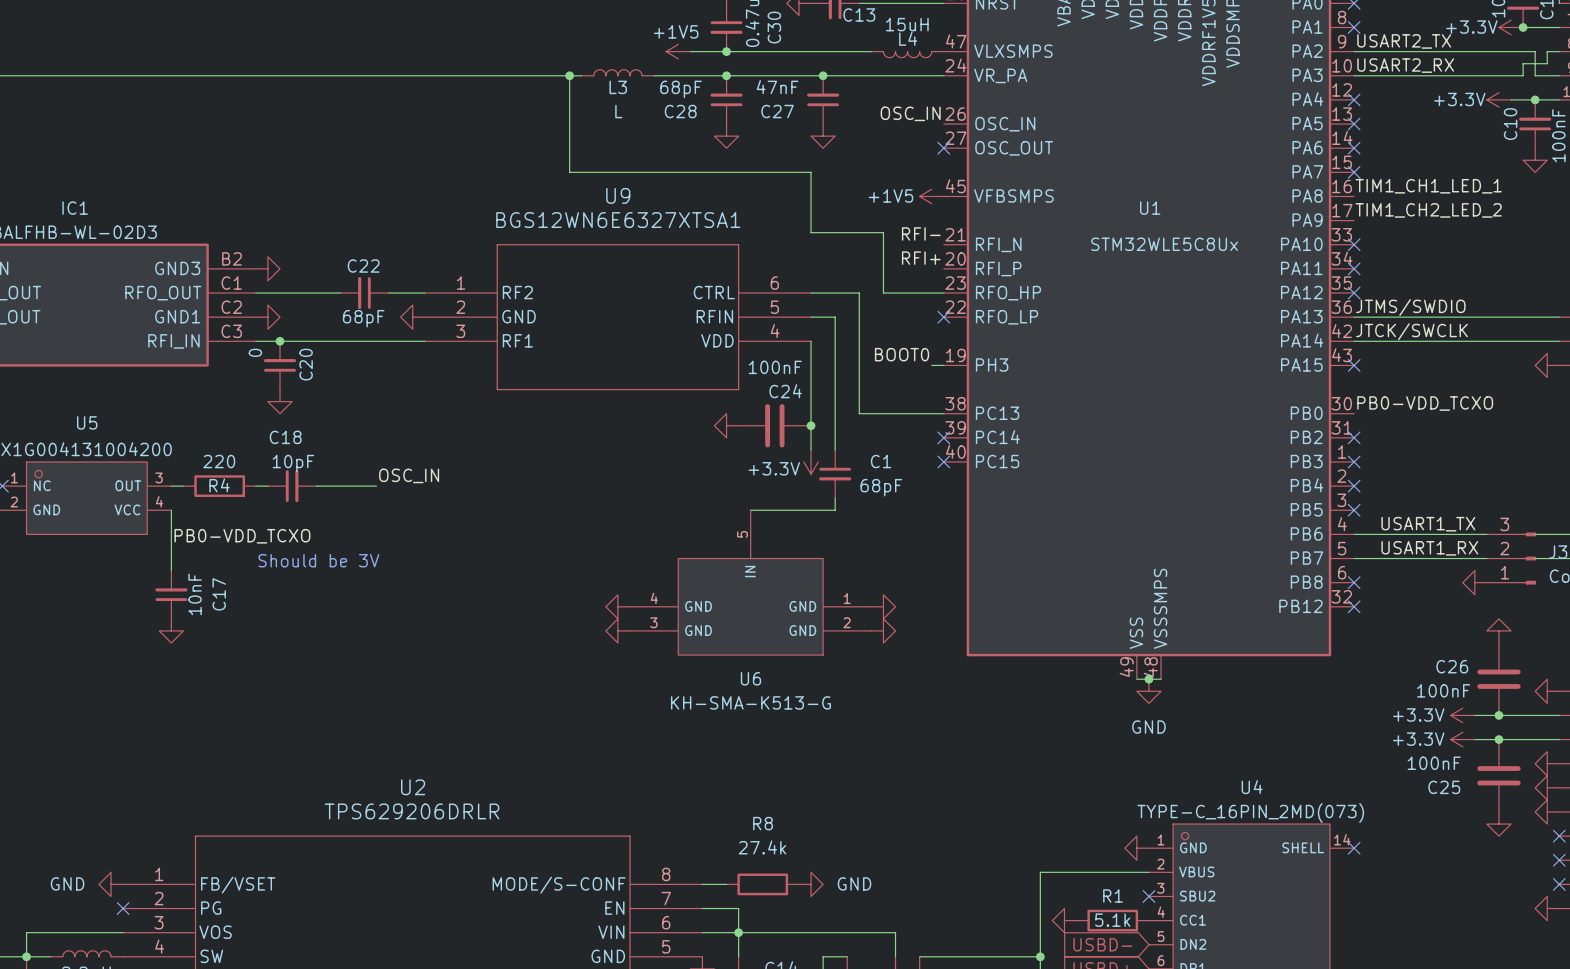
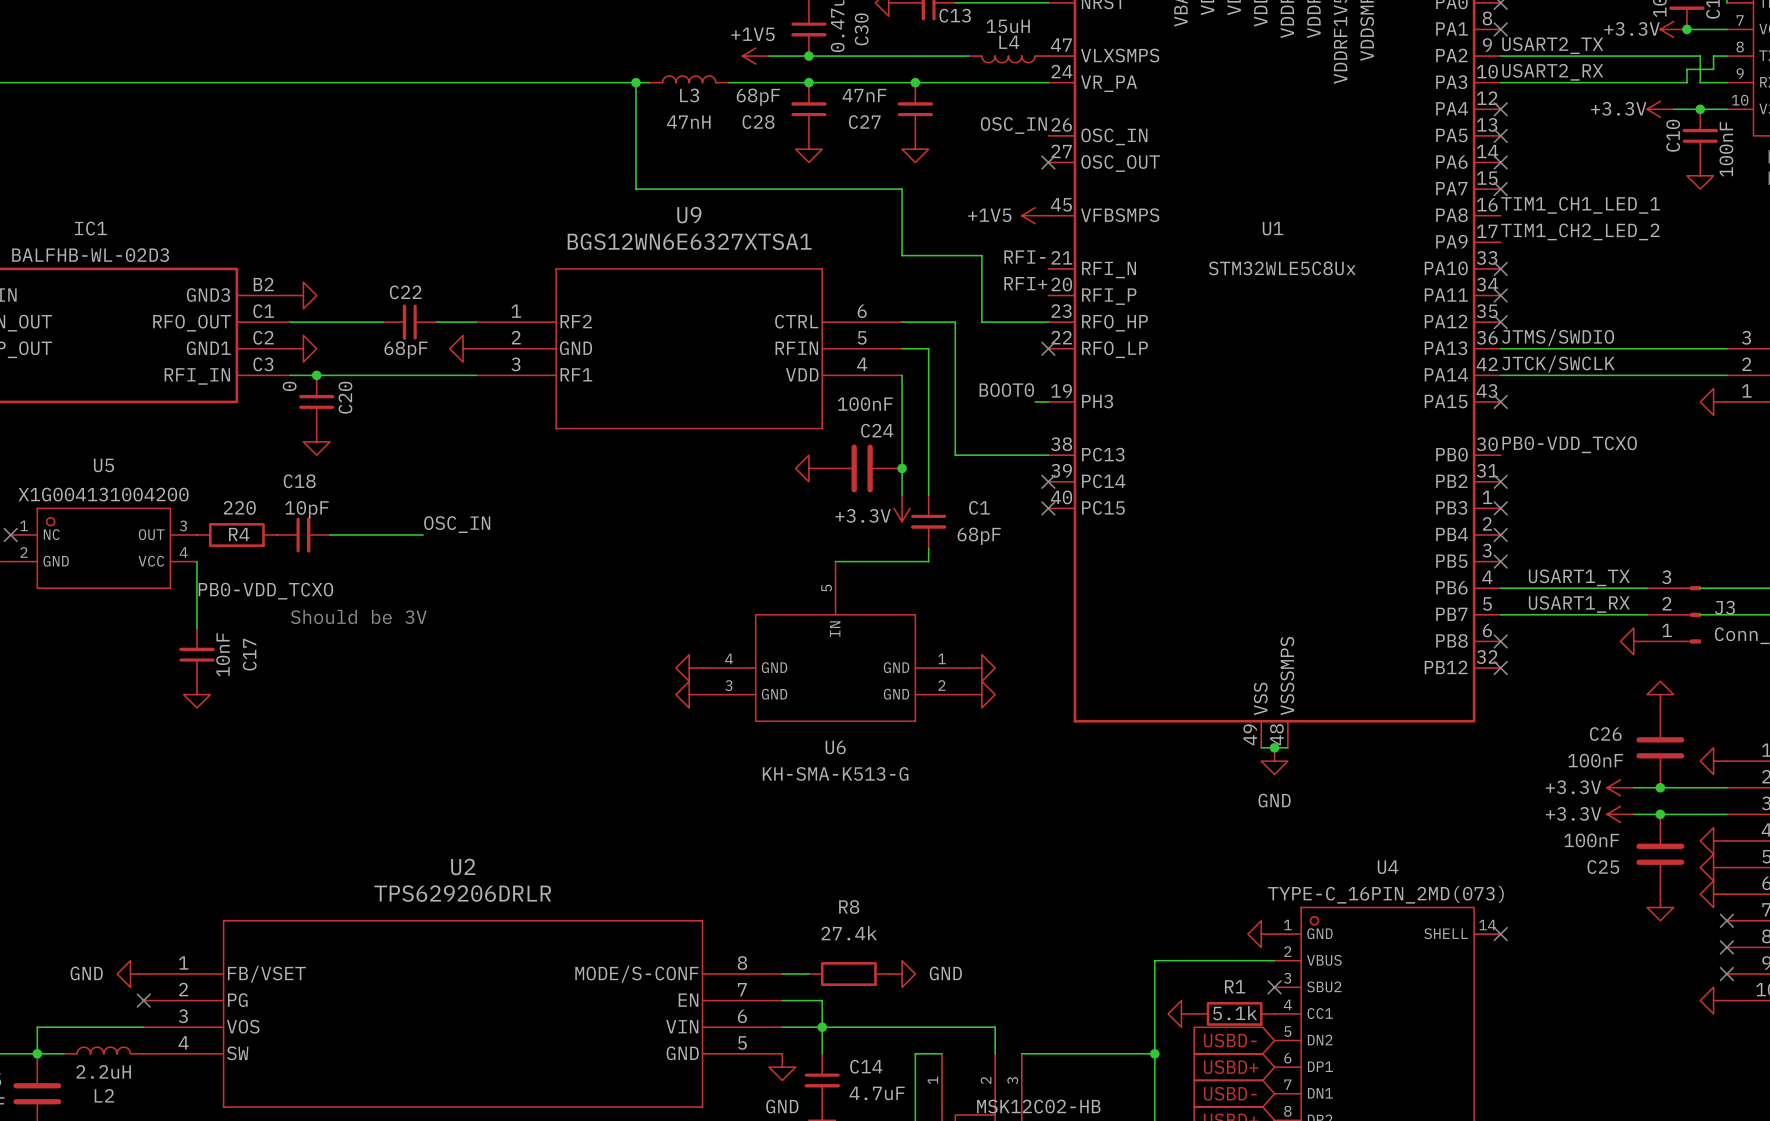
L3 value: L (618, 111) -> 47nH (688, 122)
R4 position: (219, 486) -> (236, 534)
C18 position: (292, 486) -> (303, 534)

